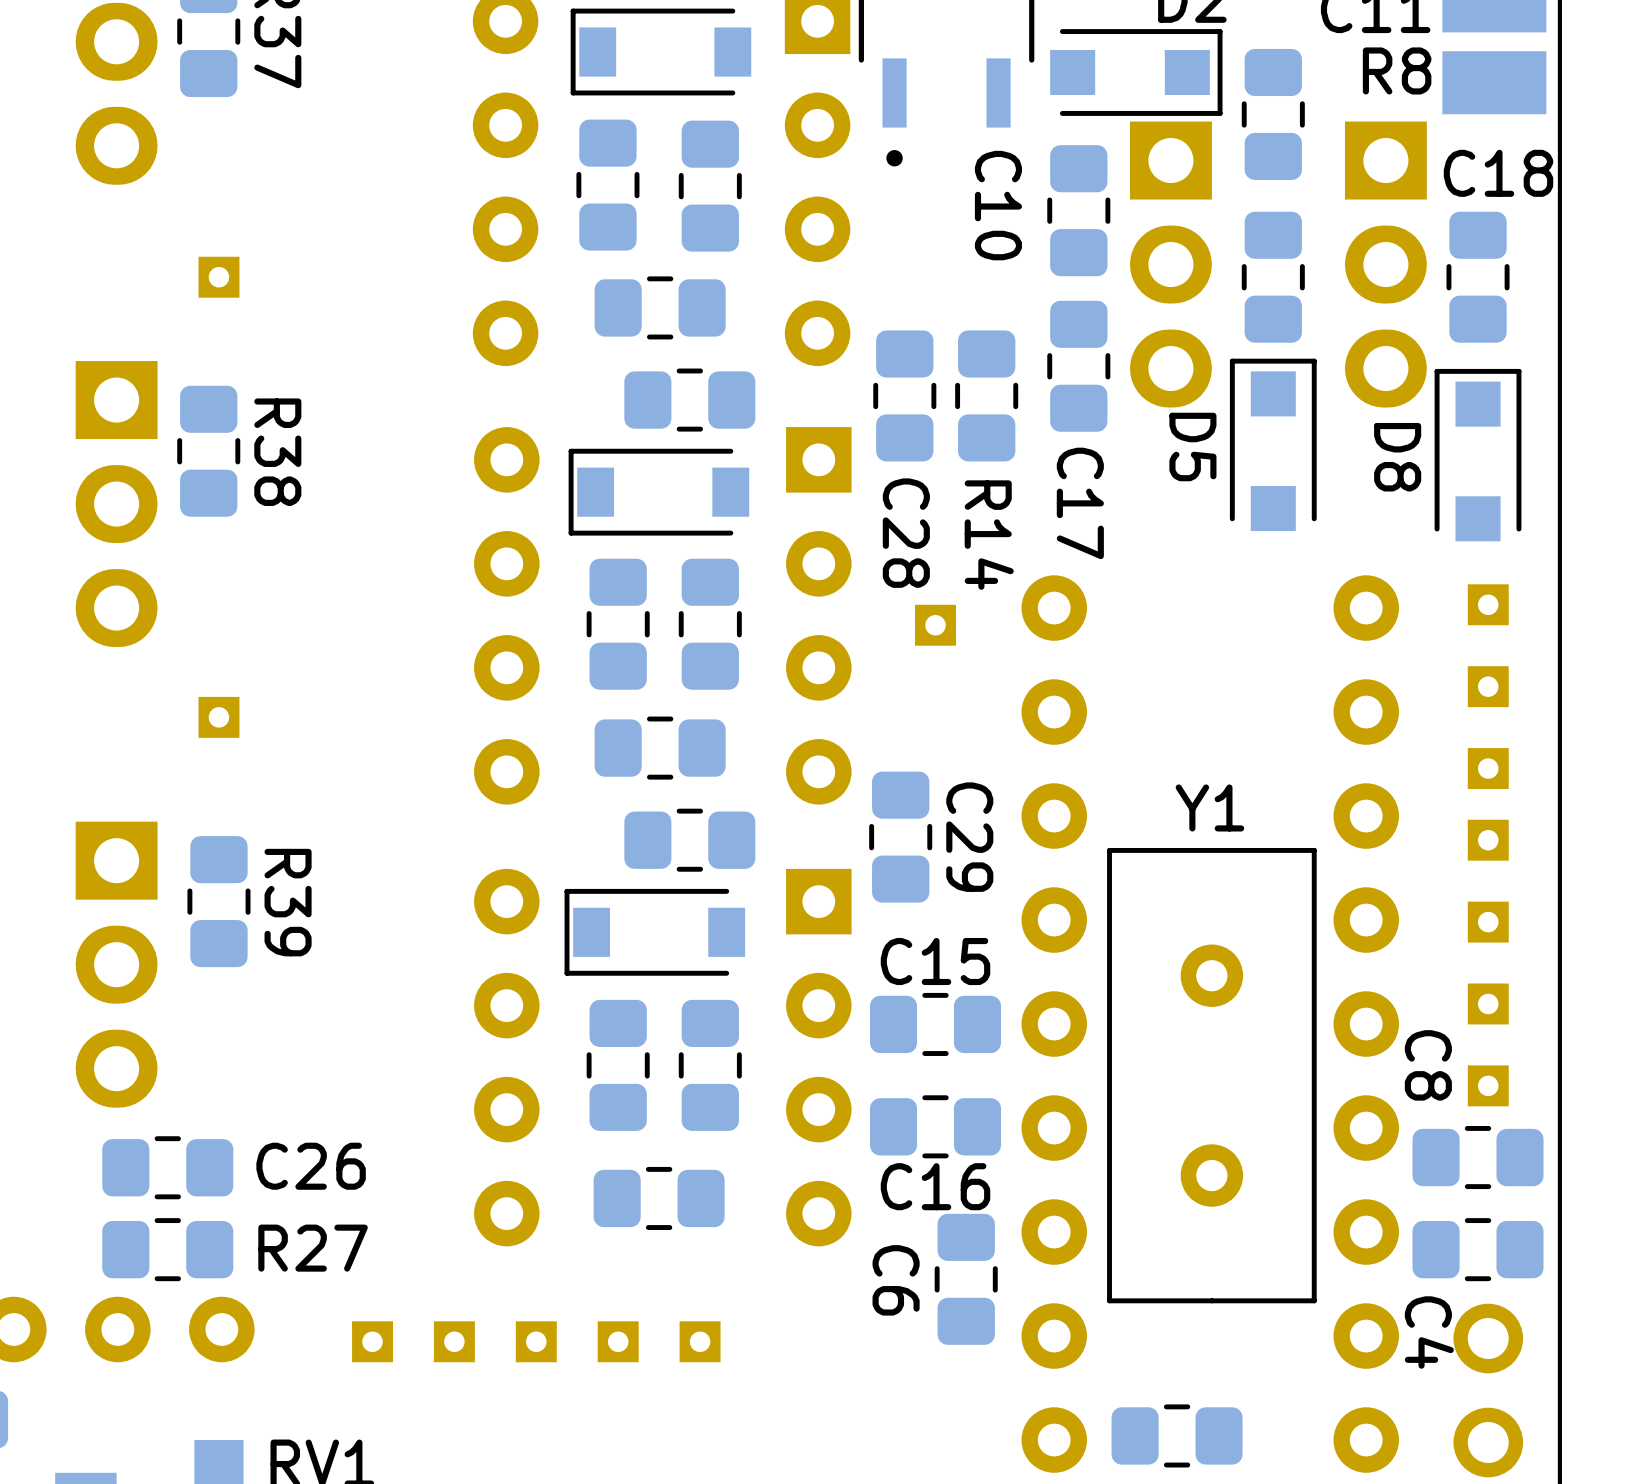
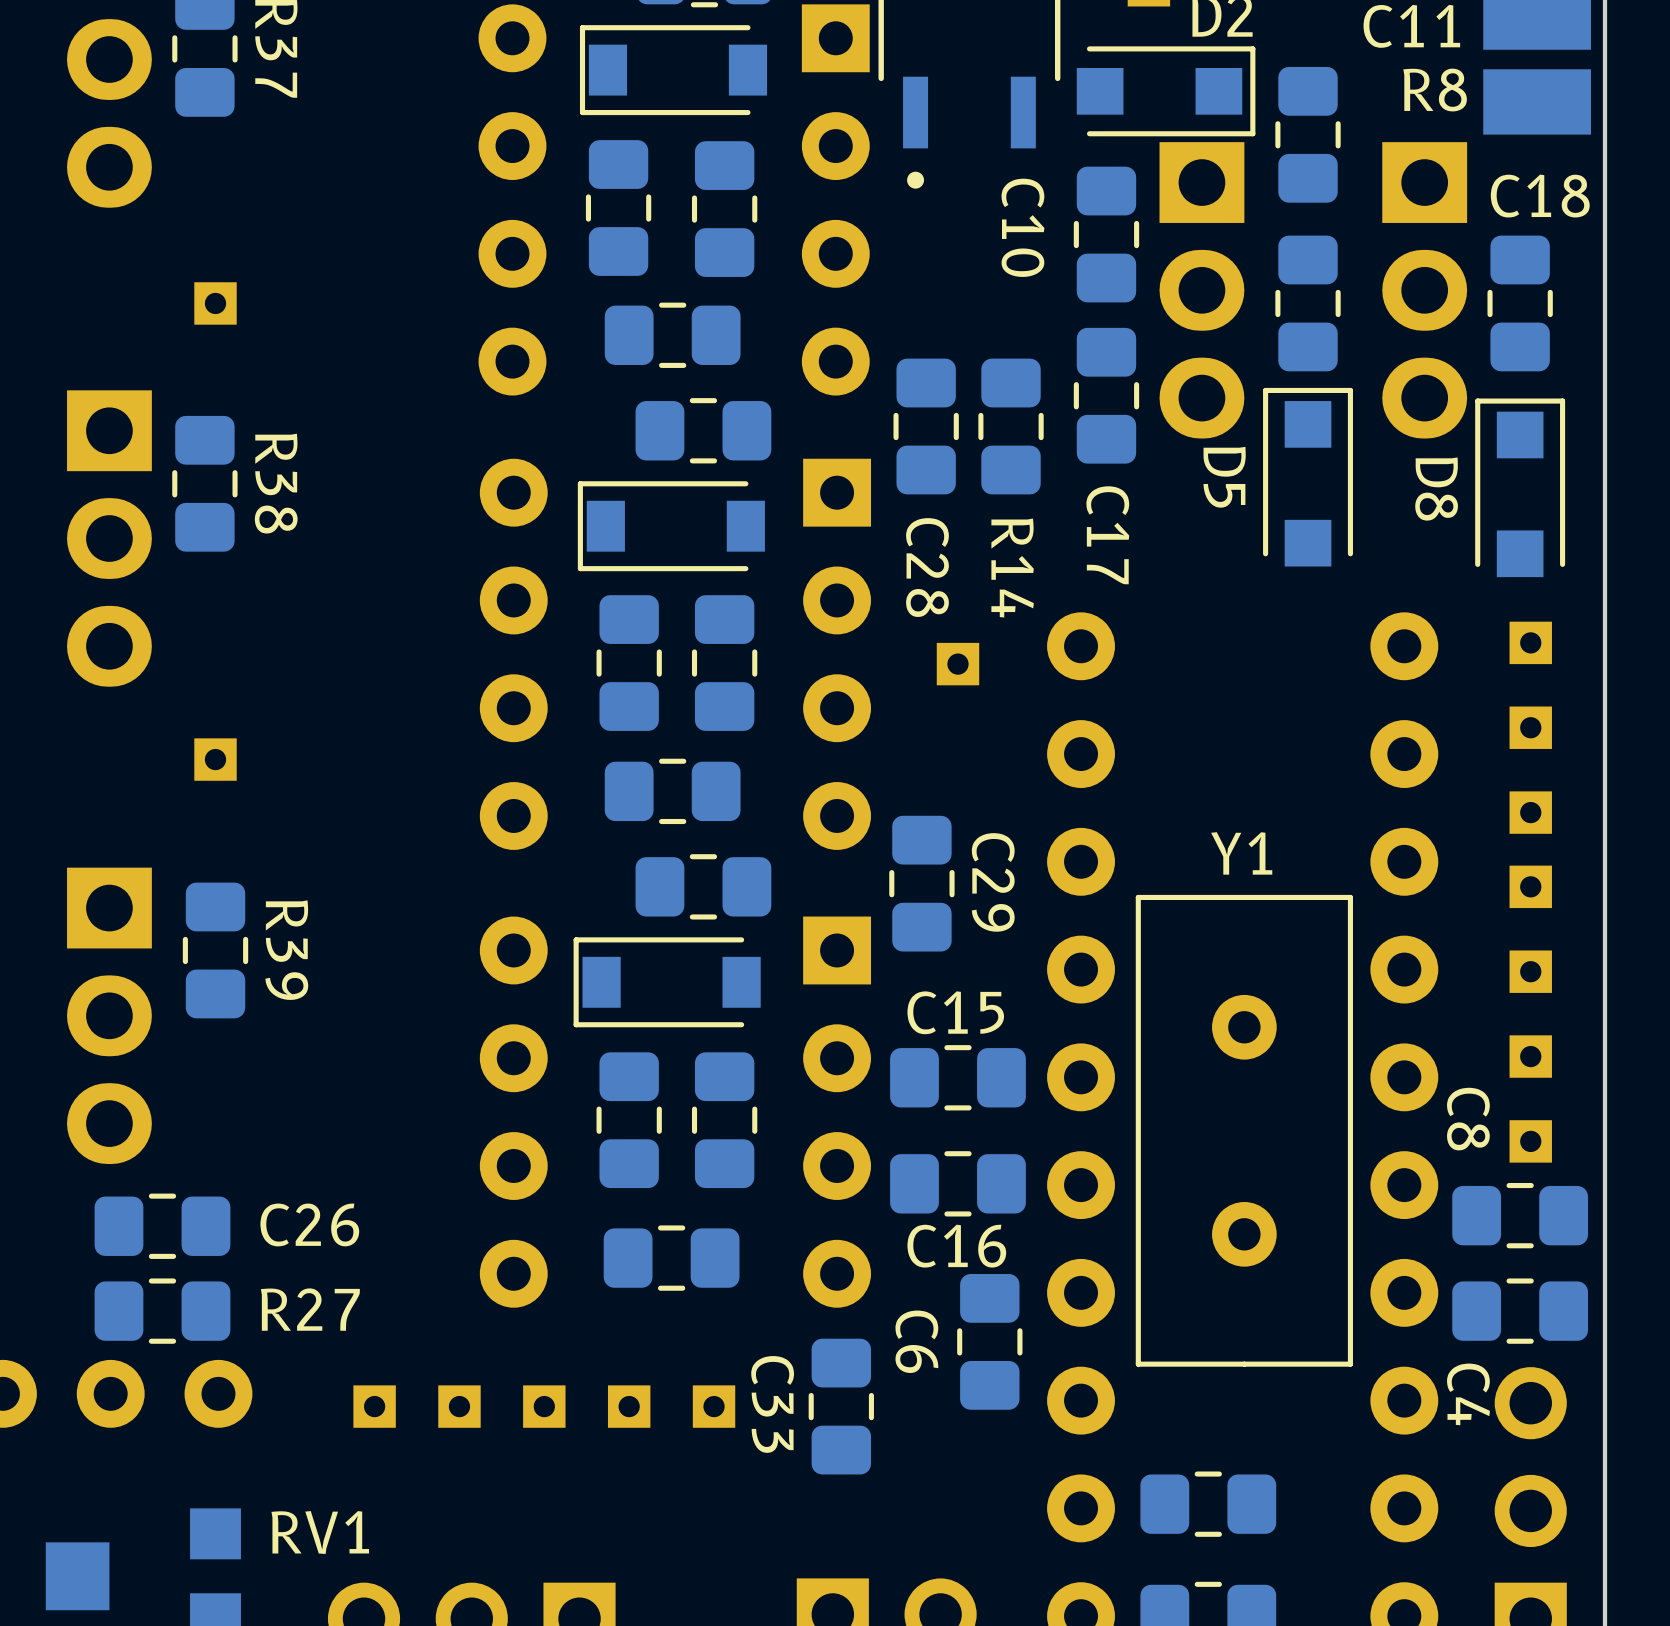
C33: none -> (841, 1406)

